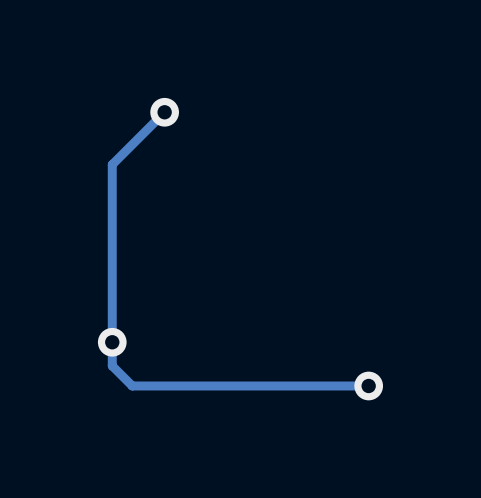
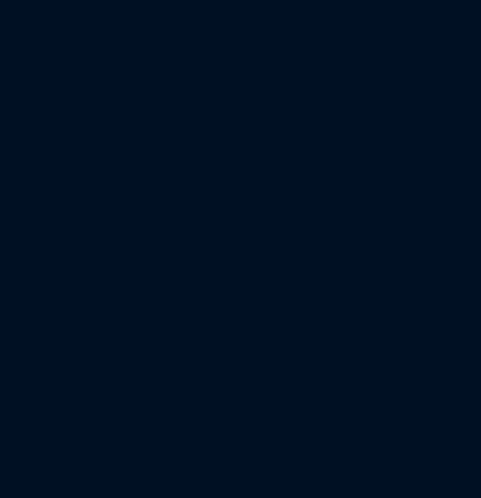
track: (164, 112) (112, 164) (112, 365) (132, 385) (368, 385) -> none
via: (164, 112) -> none
via: (112, 342) -> none
via: (368, 385) -> none

